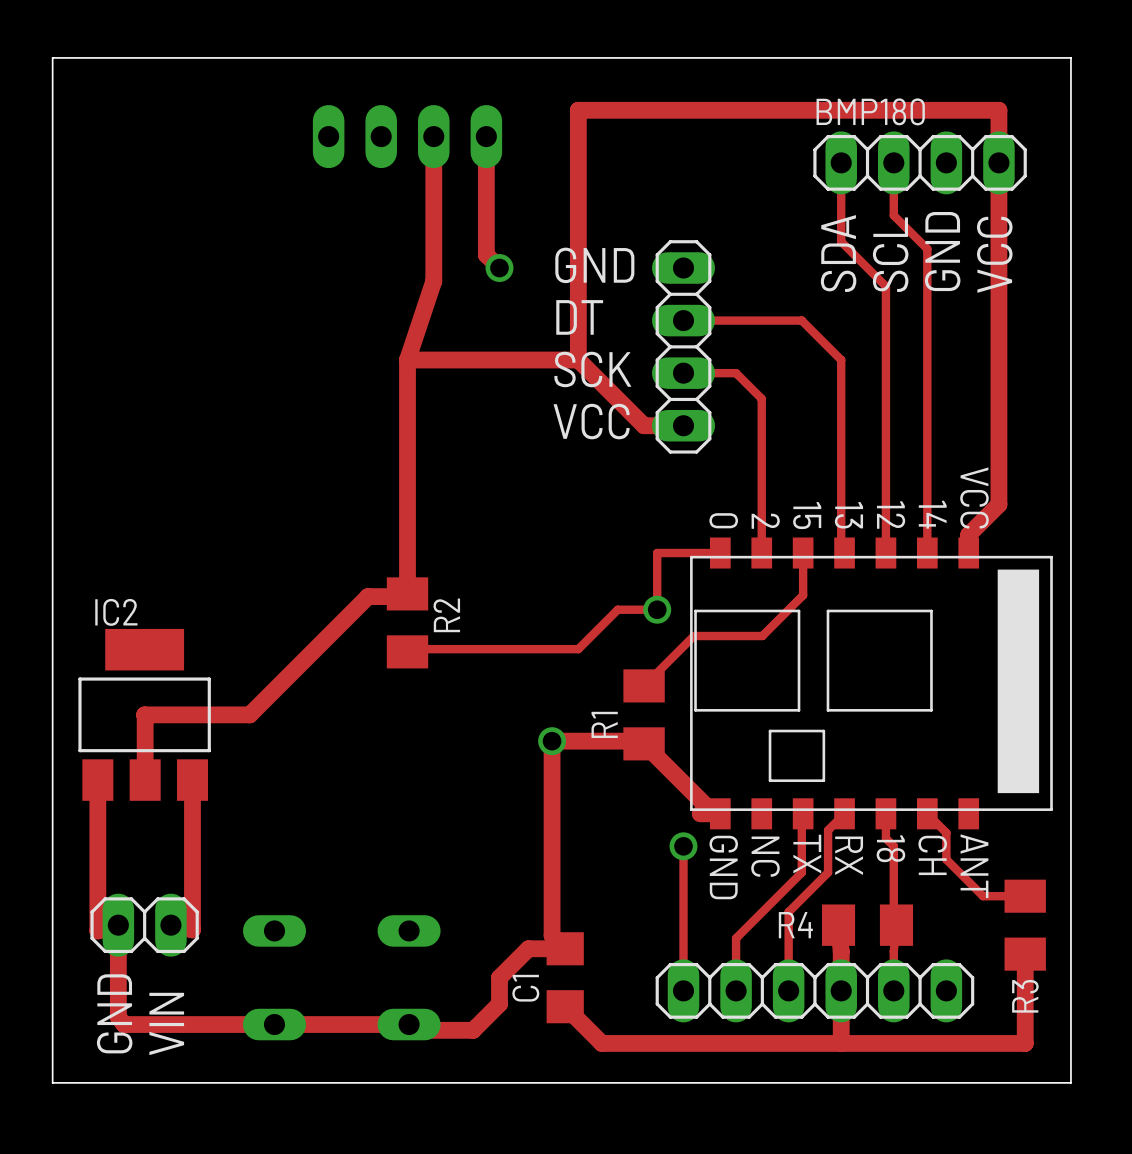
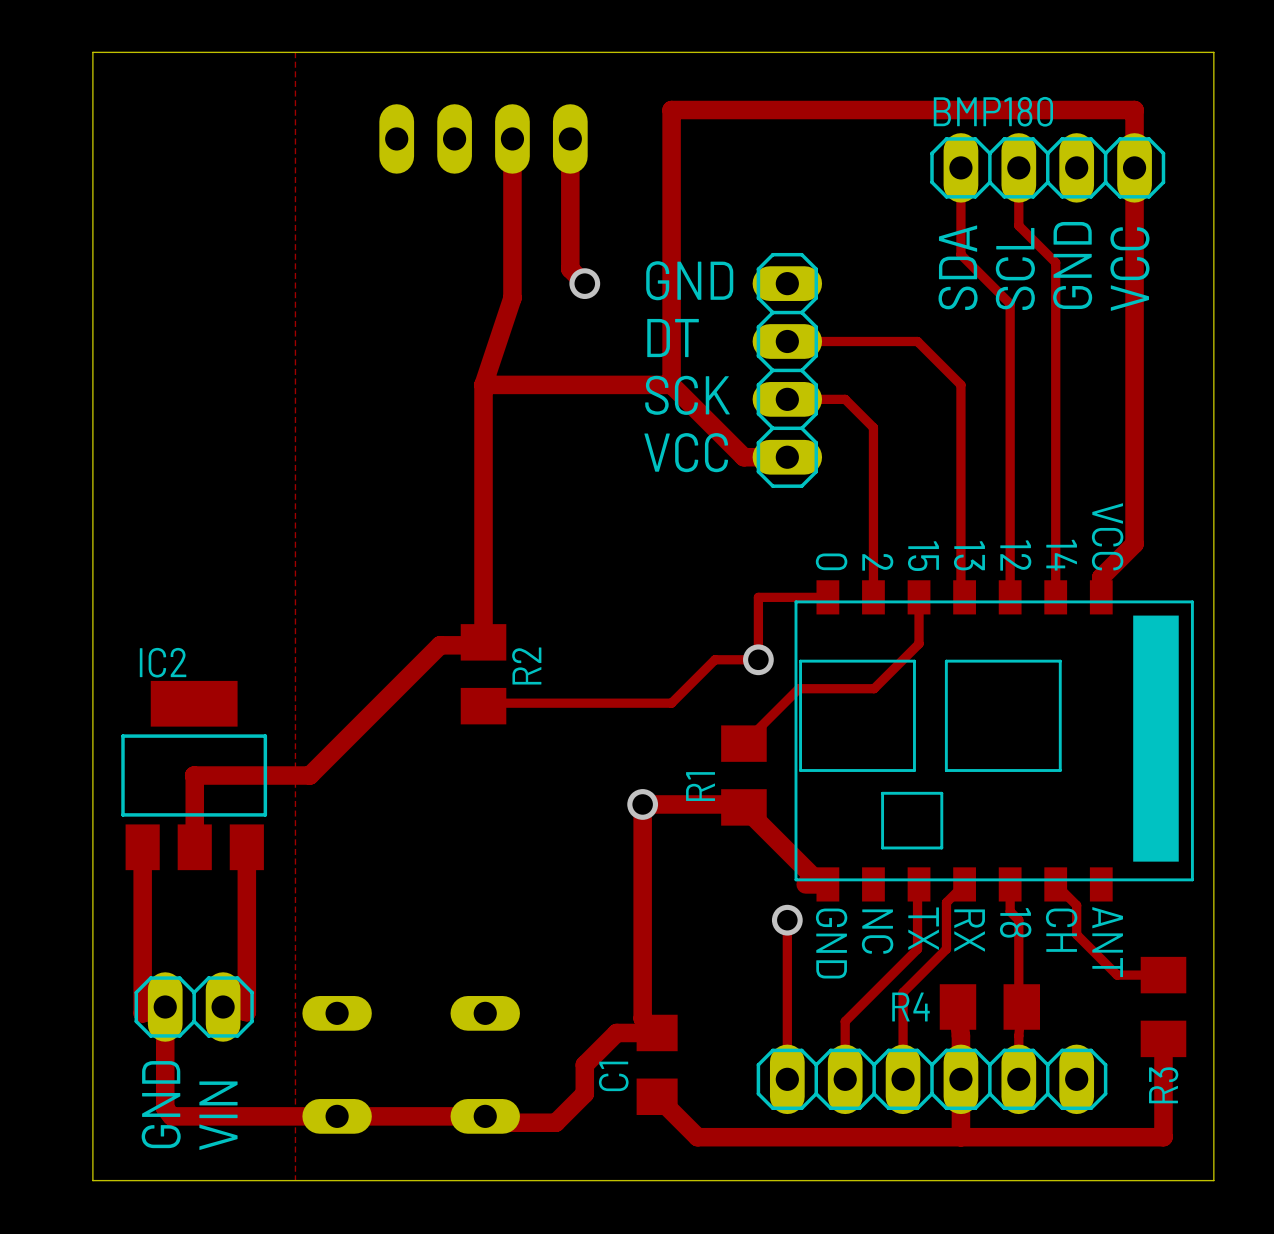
zone outline: none -> (295, 52) (295, 1180)

